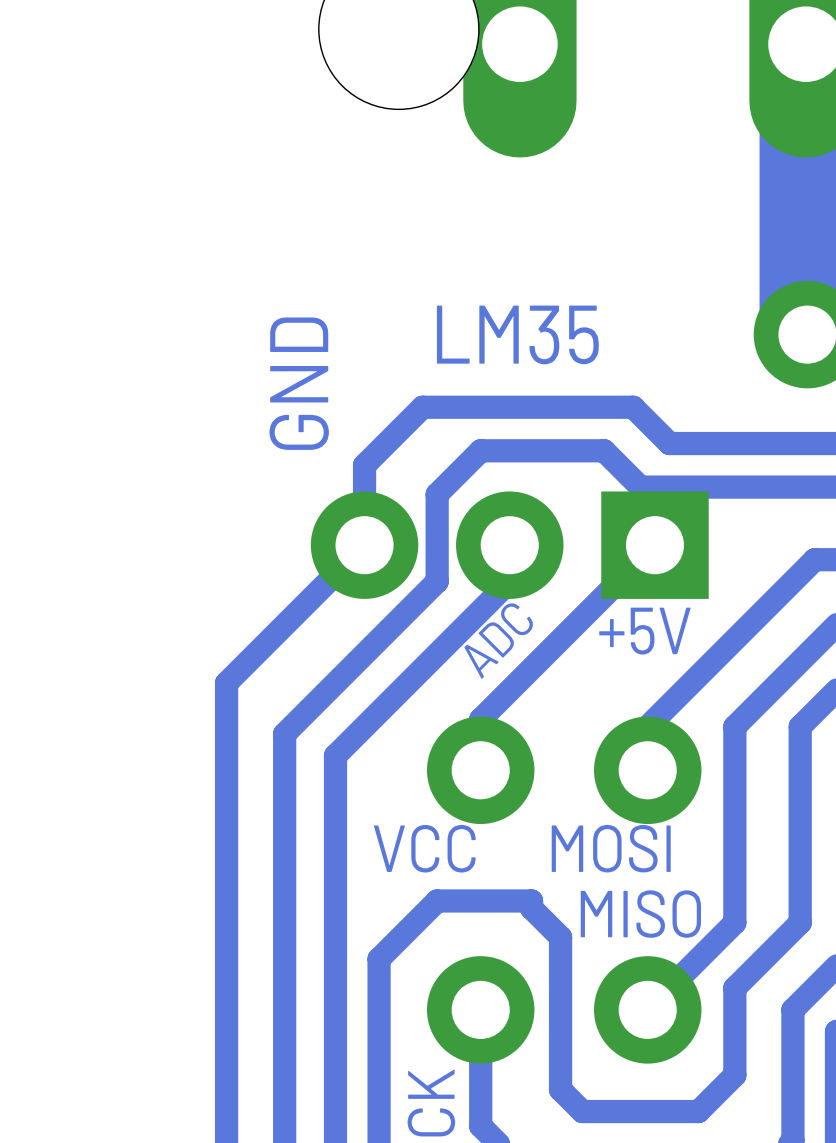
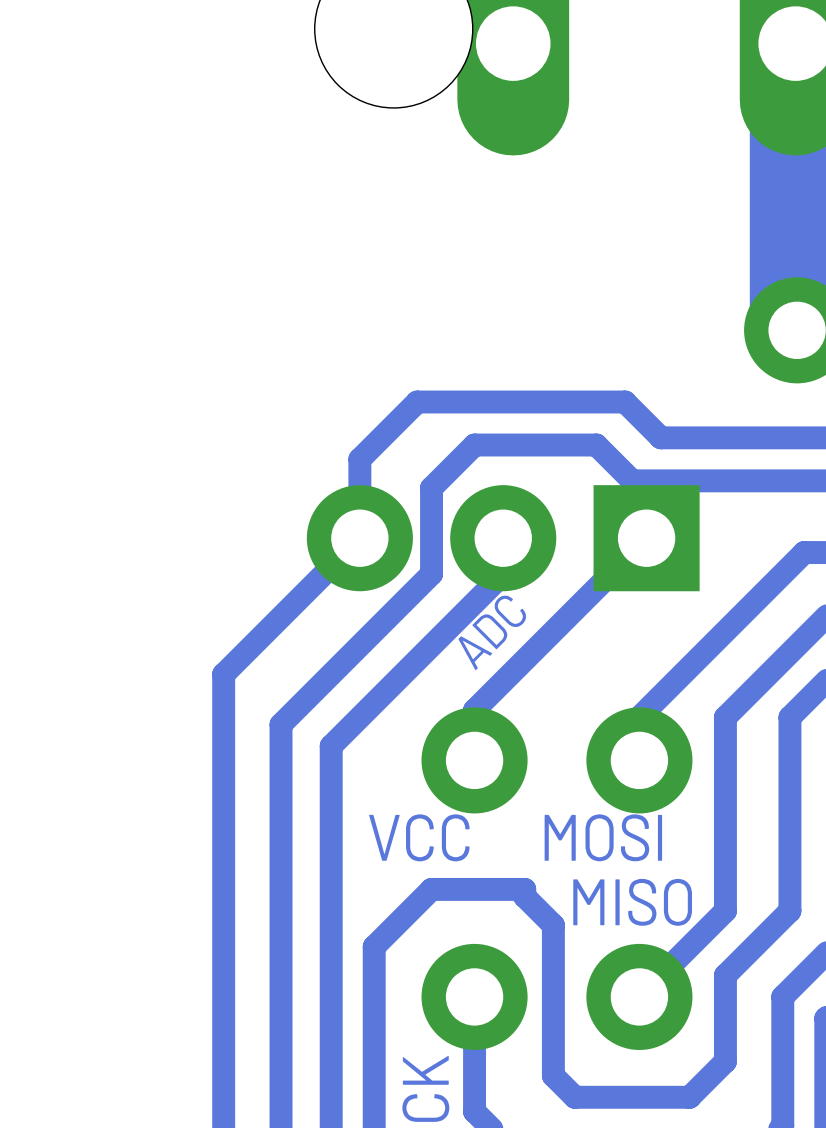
text: LM35 (517, 334) -> none
text: GND (299, 383) -> none
text: +5V (644, 631) -> none

